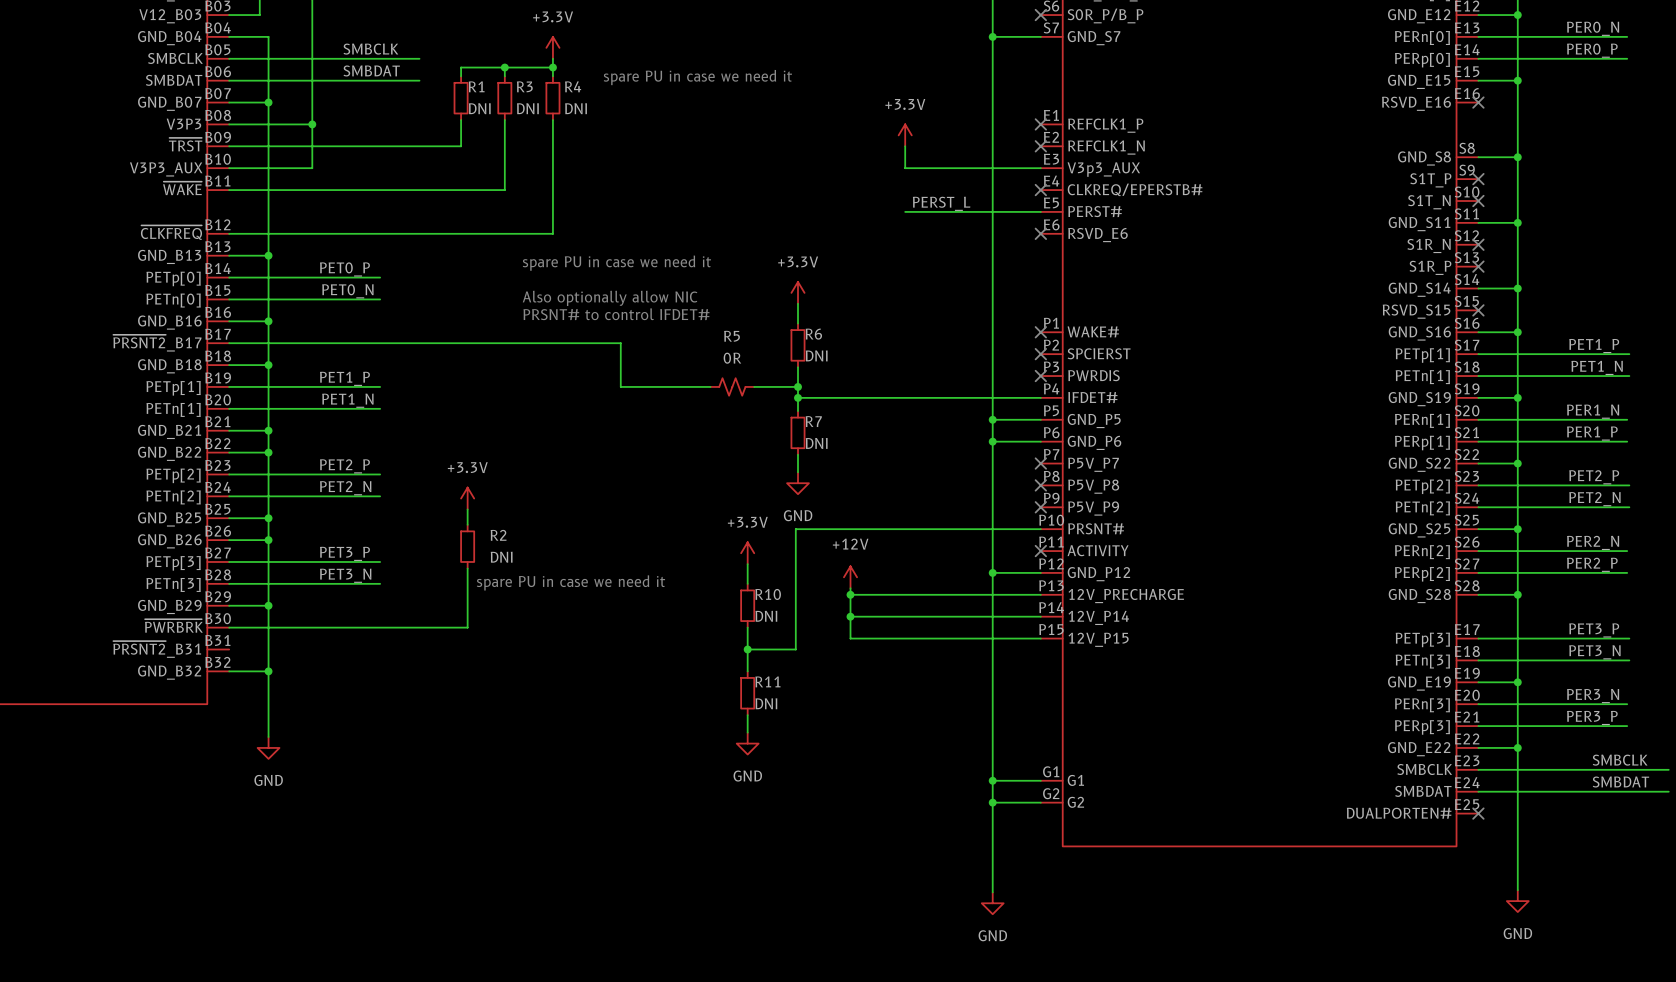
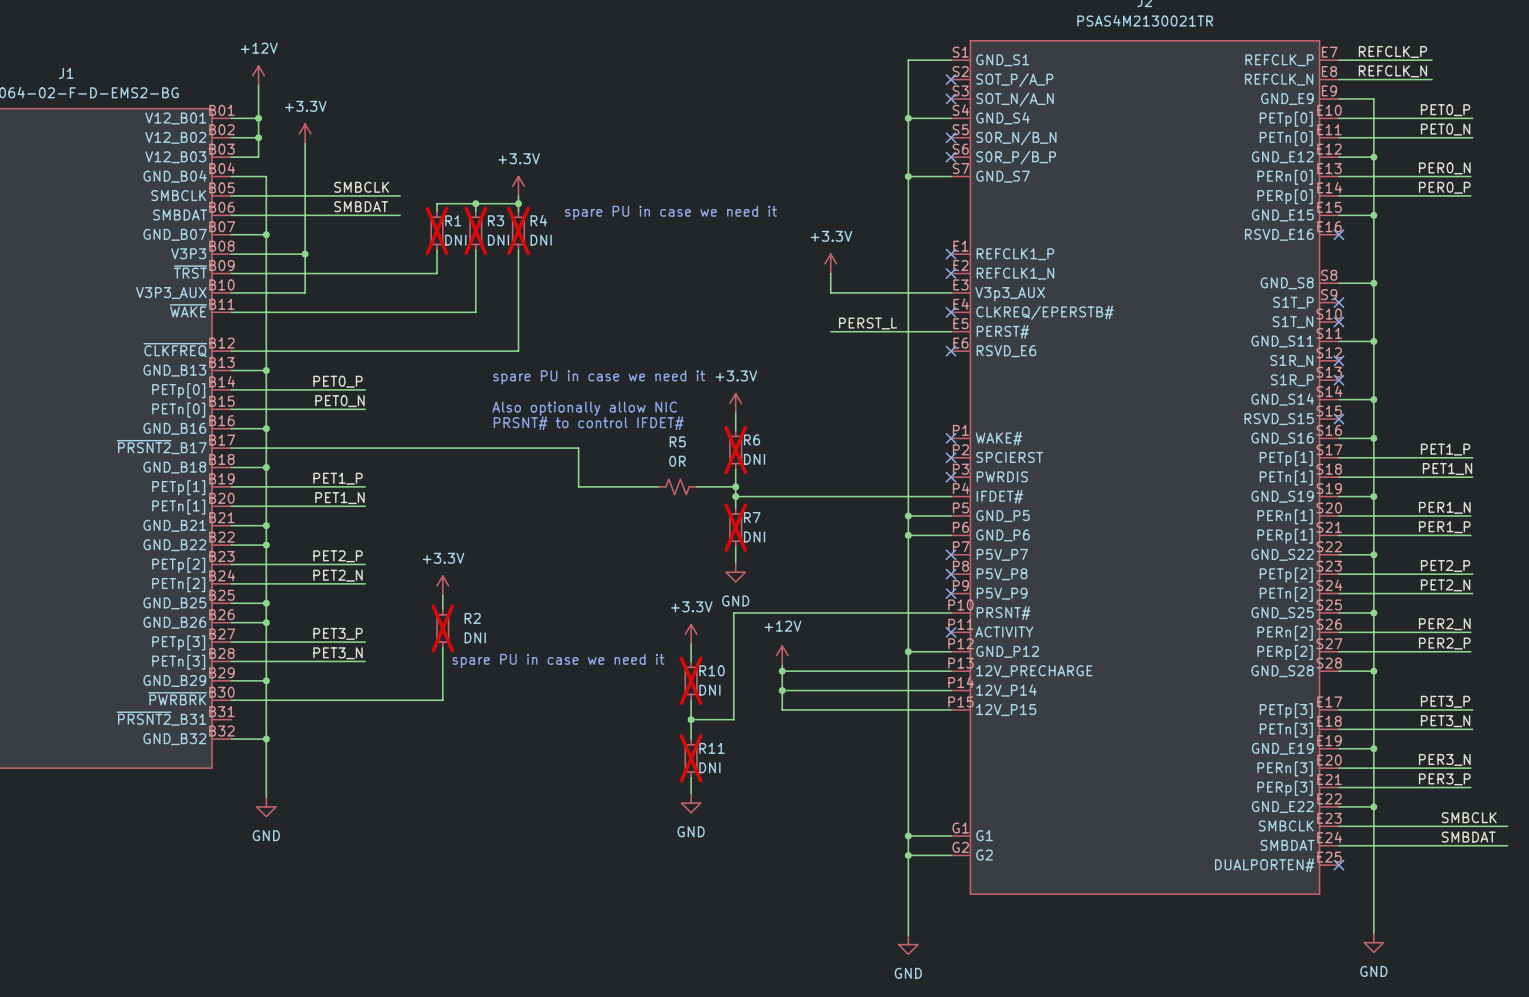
R1 do-not-place cross: none -> (437, 230)
R3 do-not-place cross: none -> (475, 230)
R4 do-not-place cross: none -> (518, 230)
R6 do-not-place cross: none -> (735, 450)
R7 do-not-place cross: none -> (735, 527)
R2 do-not-place cross: none -> (442, 628)
R10 do-not-place cross: none -> (691, 680)
R11 do-not-place cross: none -> (691, 758)

